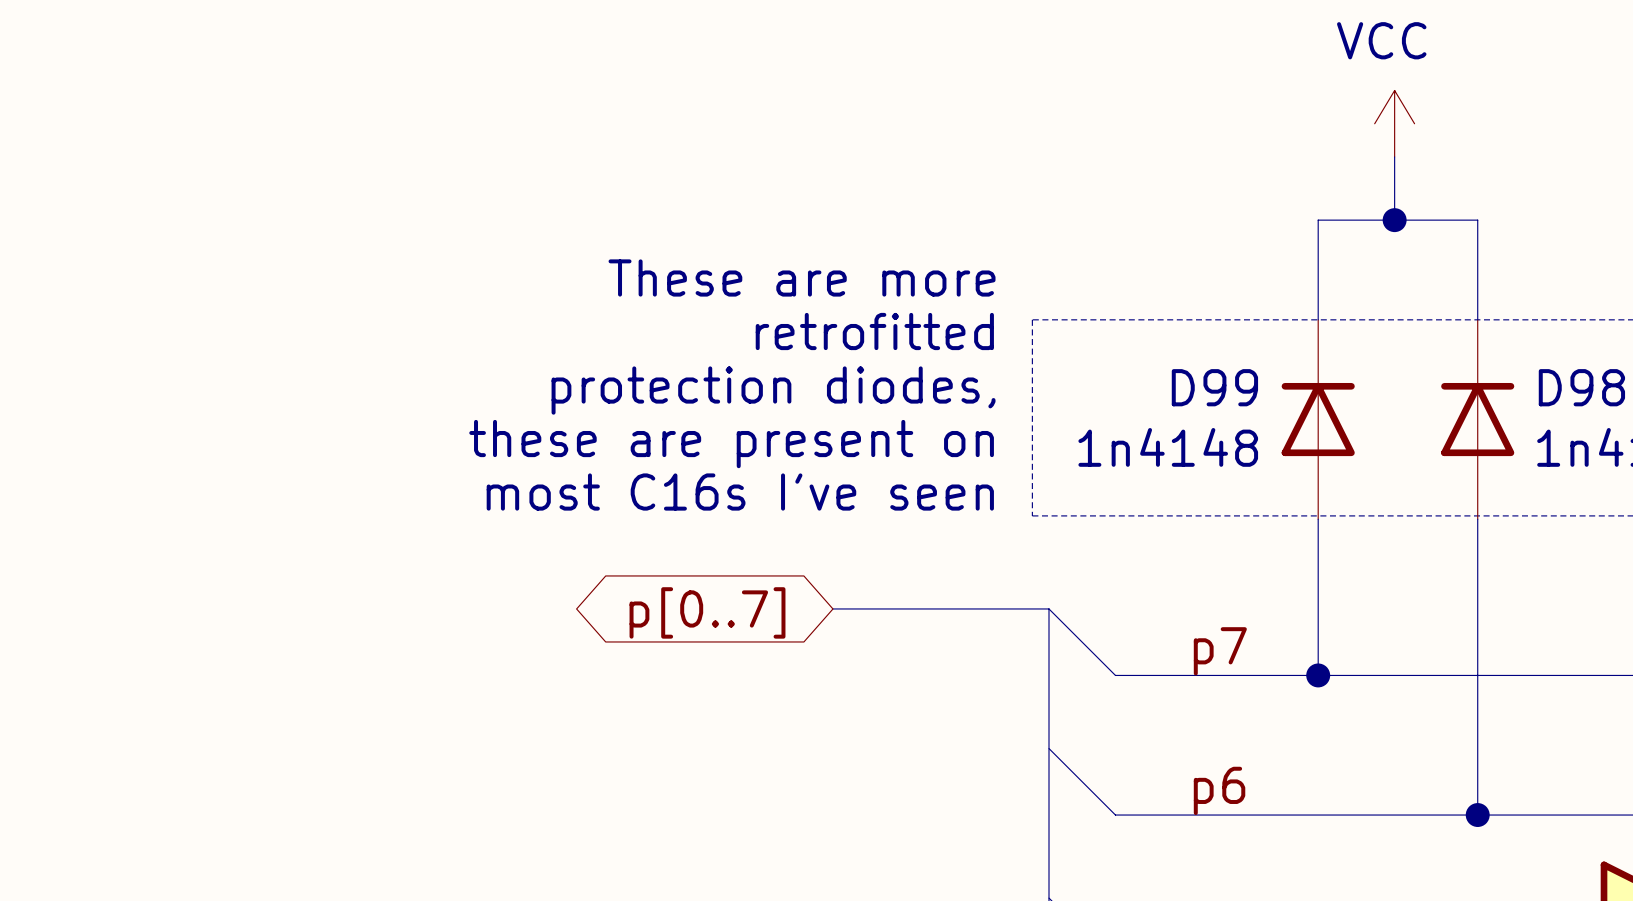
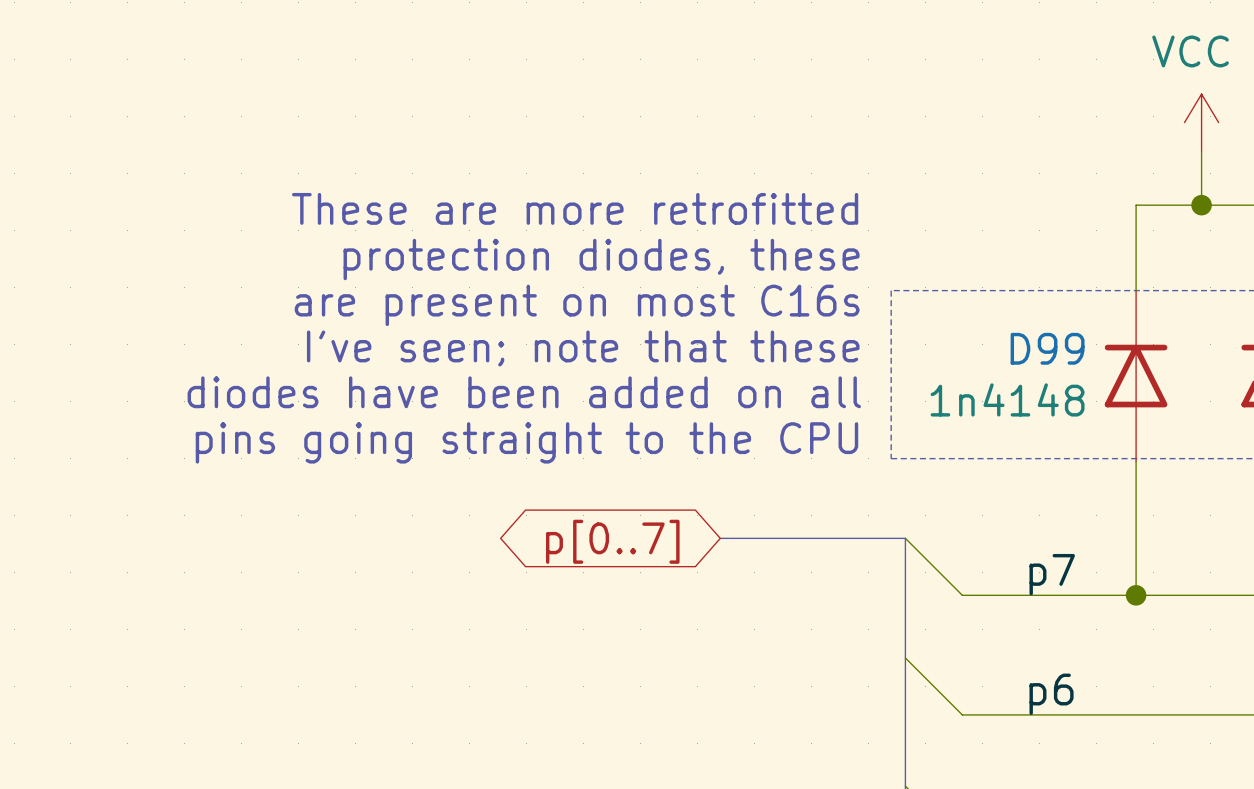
text: none -> These are more retrofitted (575, 208)
text: These are more (802, 277) -> protection diodes, these (601, 259)
text: retrofitted (874, 331) -> are present on most C16s (577, 305)
text: protection diodes, (773, 390) -> I've seen; note that these (583, 348)
text: these are present on (731, 444) -> diodes have been added on all (524, 392)
text: most C16s I've seen (740, 492) -> pins going straight to the CPU (526, 442)

